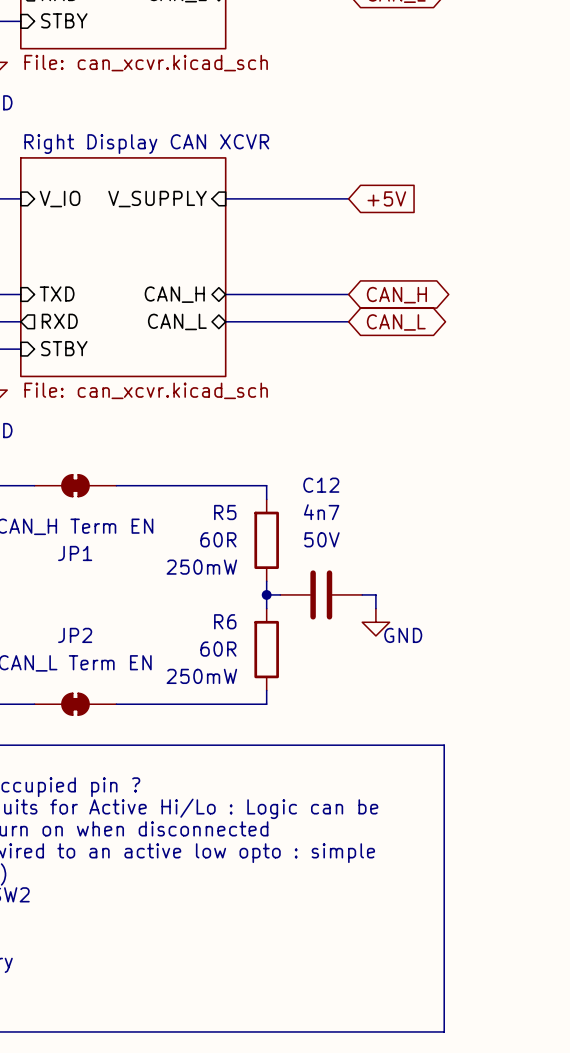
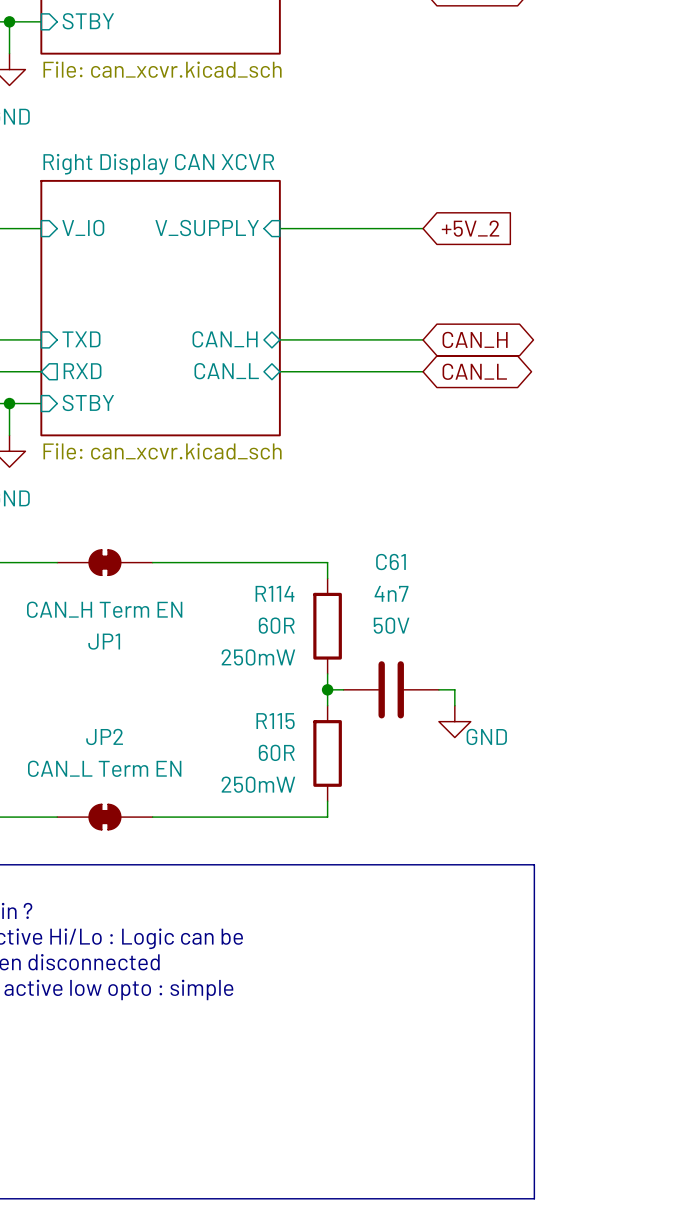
global label: +5V (386, 198) -> +5V_2 (470, 228)
C12 name: C12 (321, 485) -> C61 (390, 562)
R5 name: R5 (225, 512) -> R114 (275, 593)
R6 name: R6 (225, 621) -> R115 (275, 721)

